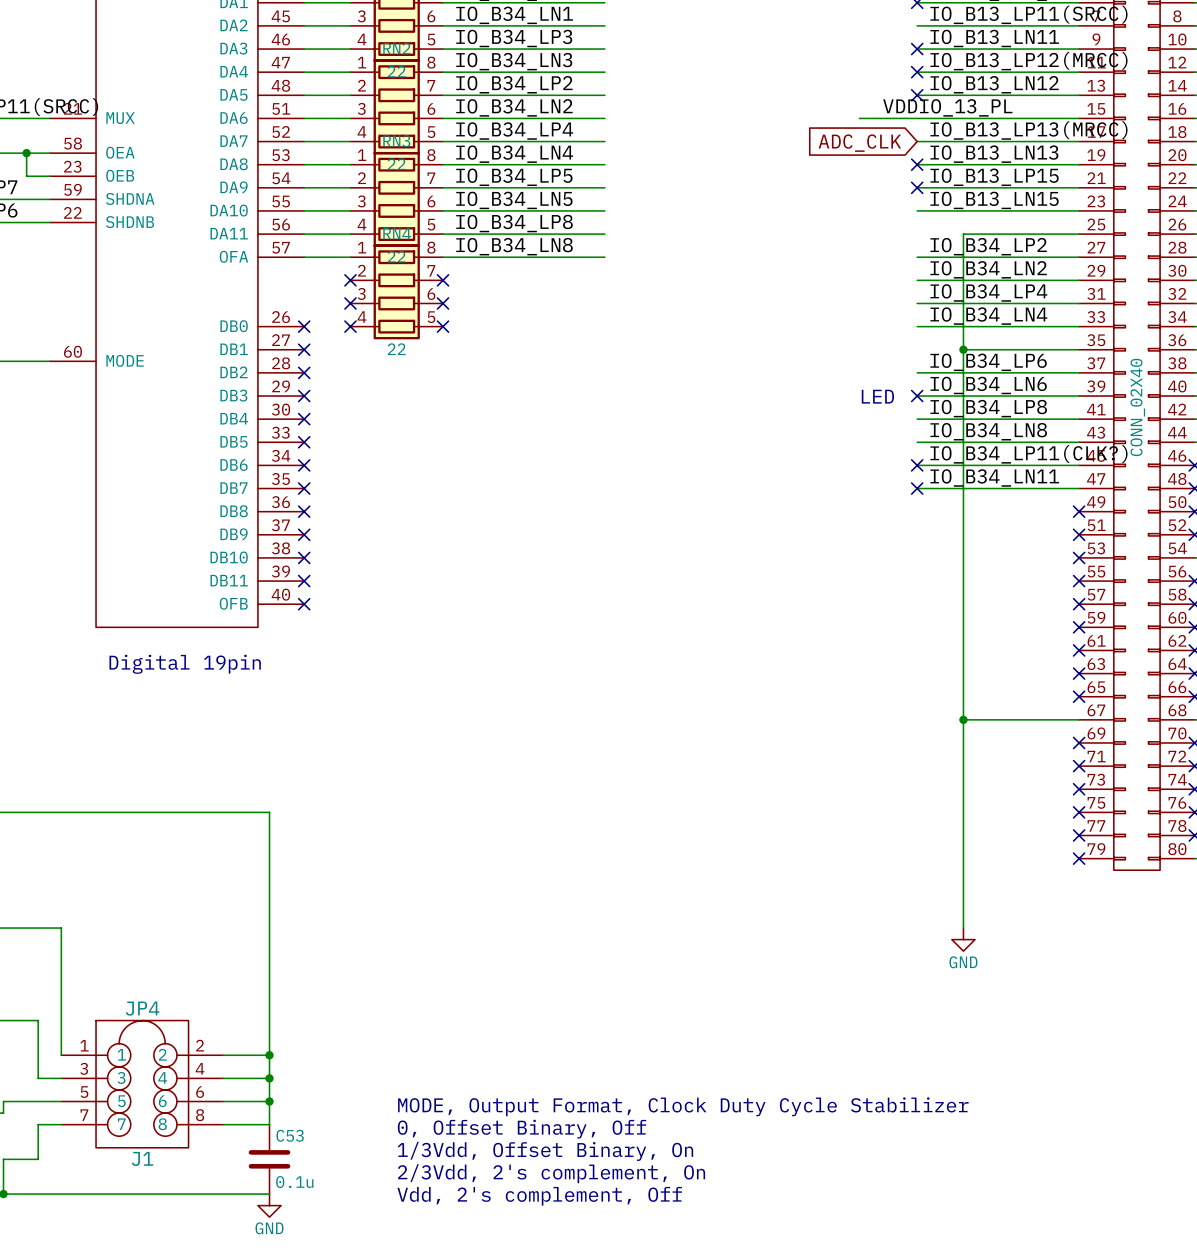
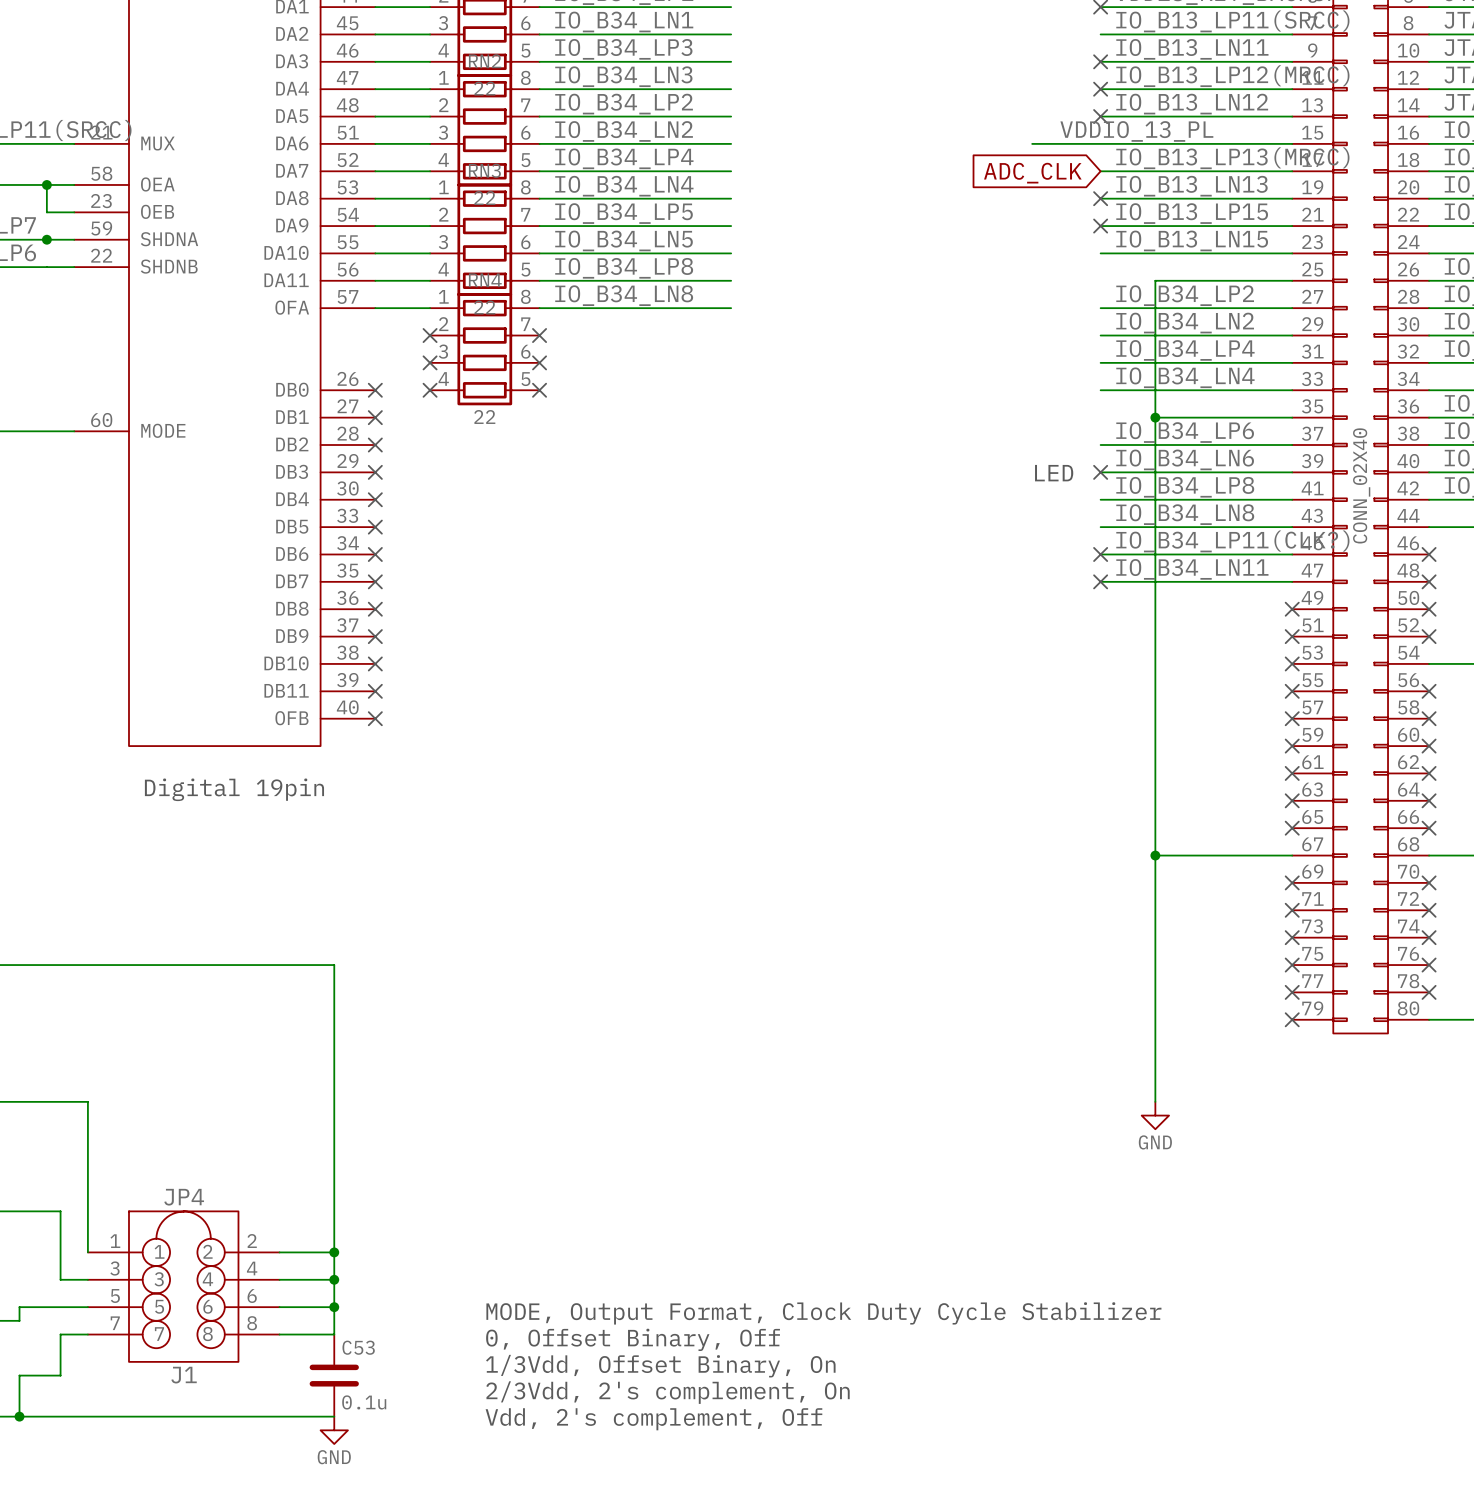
junction: none -> (46, 239)

